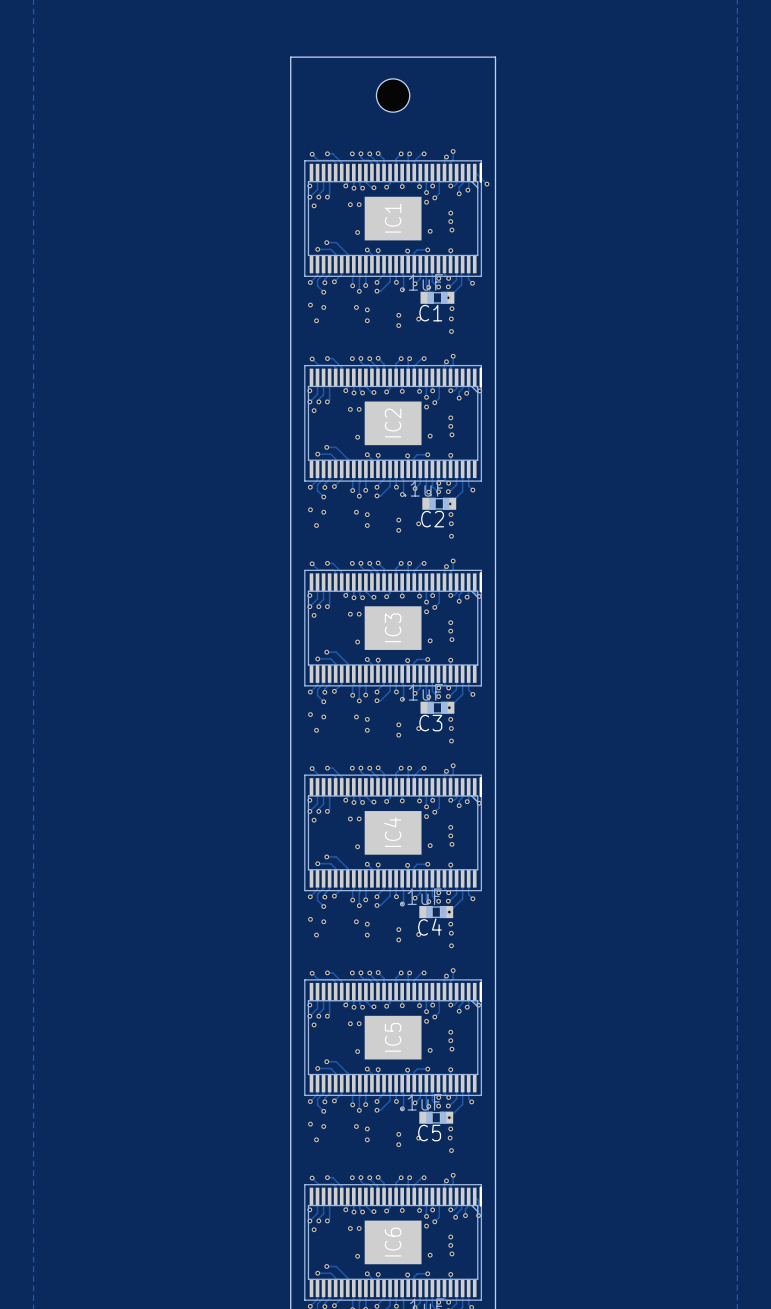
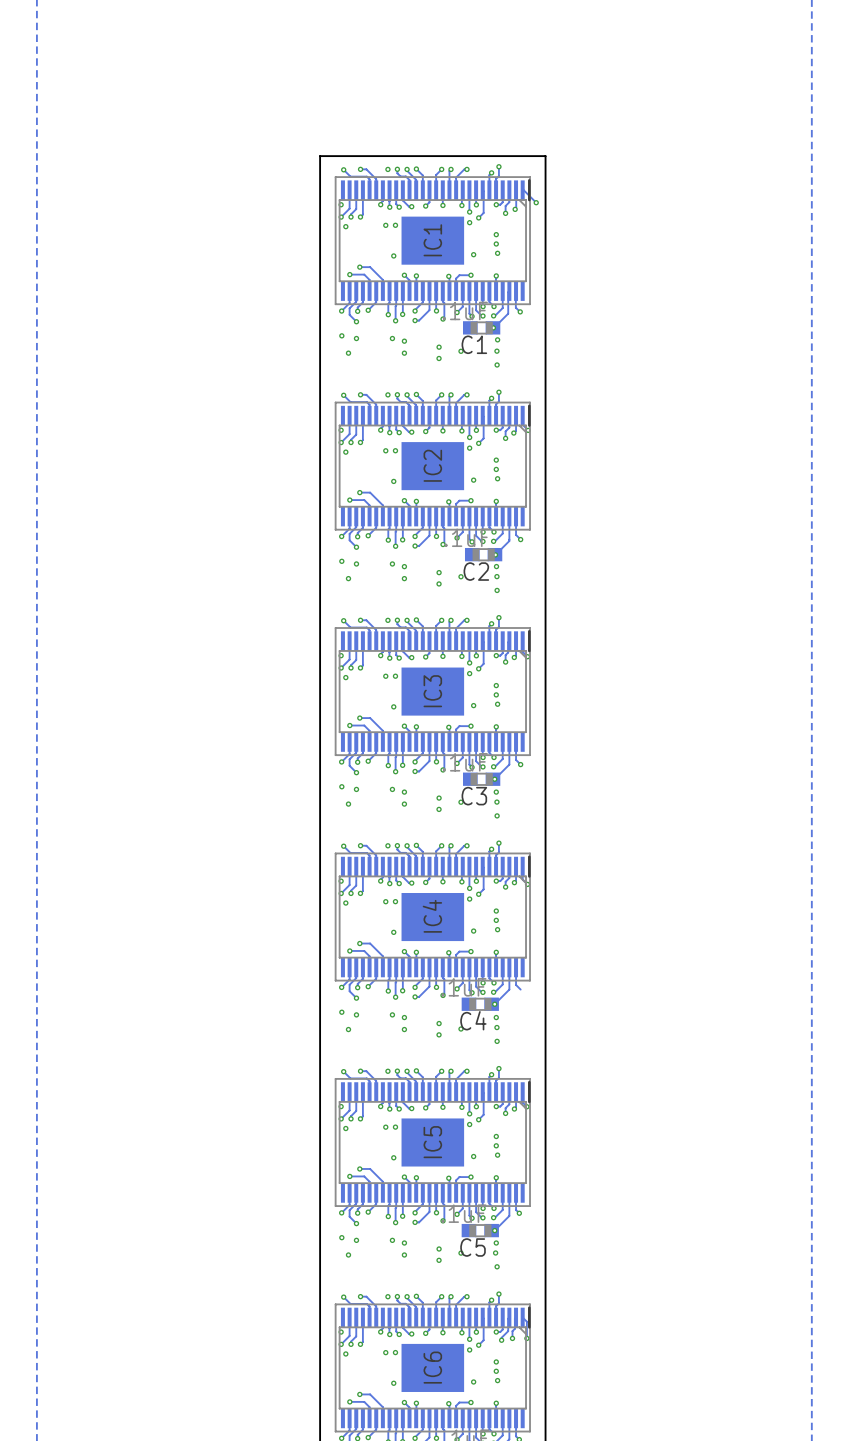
hole: (393, 95) -> none
board edge: (495, 141) (495, 57) (290, 57) (290, 141) -> (545, 156) (320, 156)
via: (472, 898) -> none

